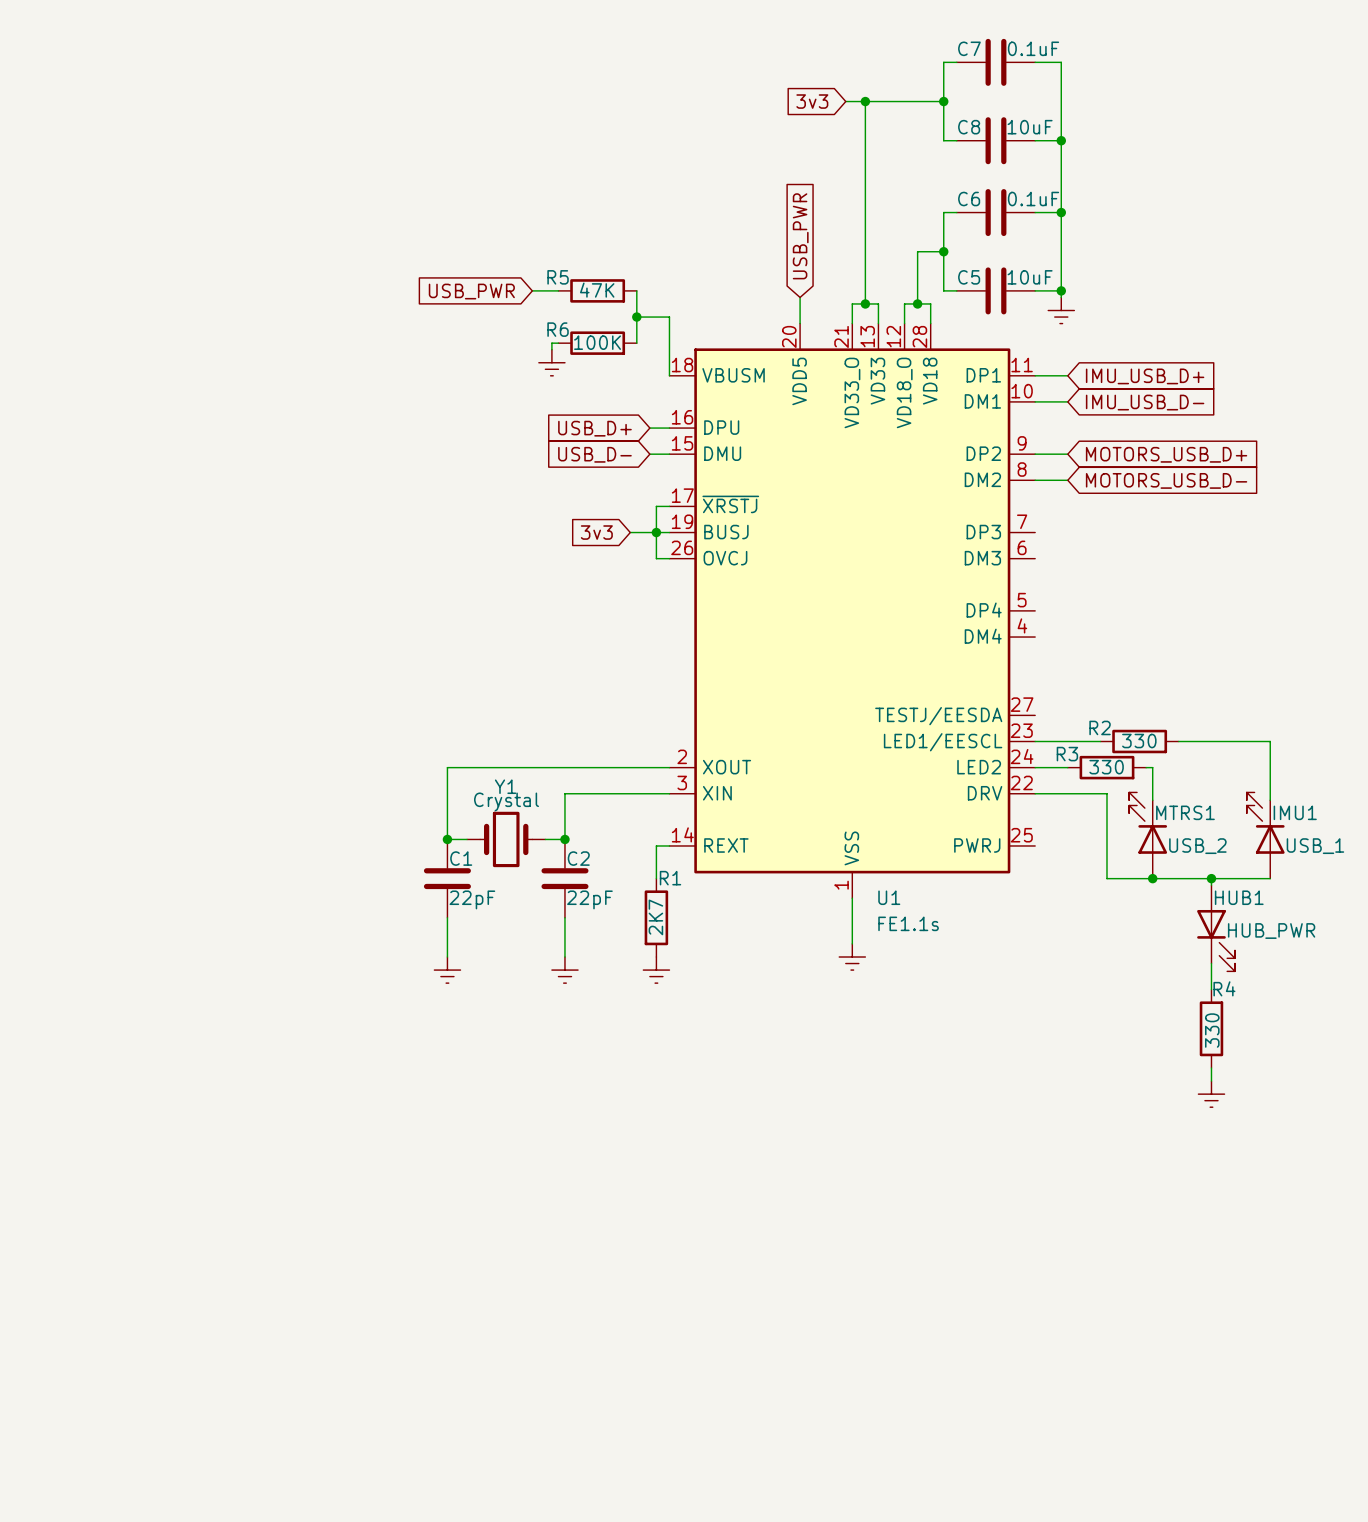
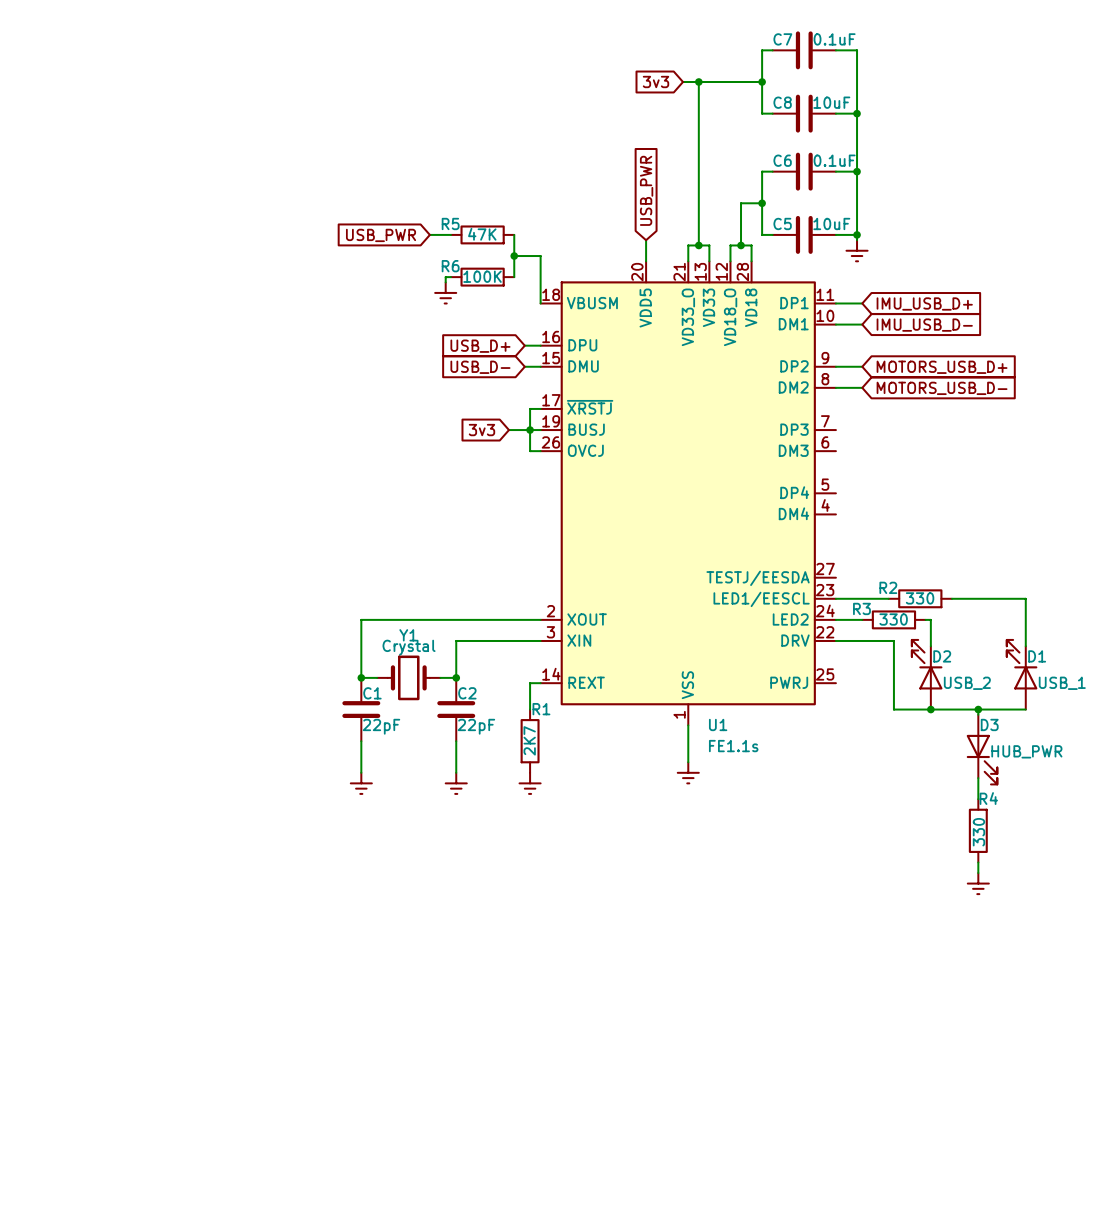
MTRS1 name: MTRS1 (1185, 812) -> D2 (942, 656)
IMU1 name: IMU1 (1295, 812) -> D1 (1037, 656)
HUB1 name: HUB1 (1239, 897) -> D3 (989, 724)

